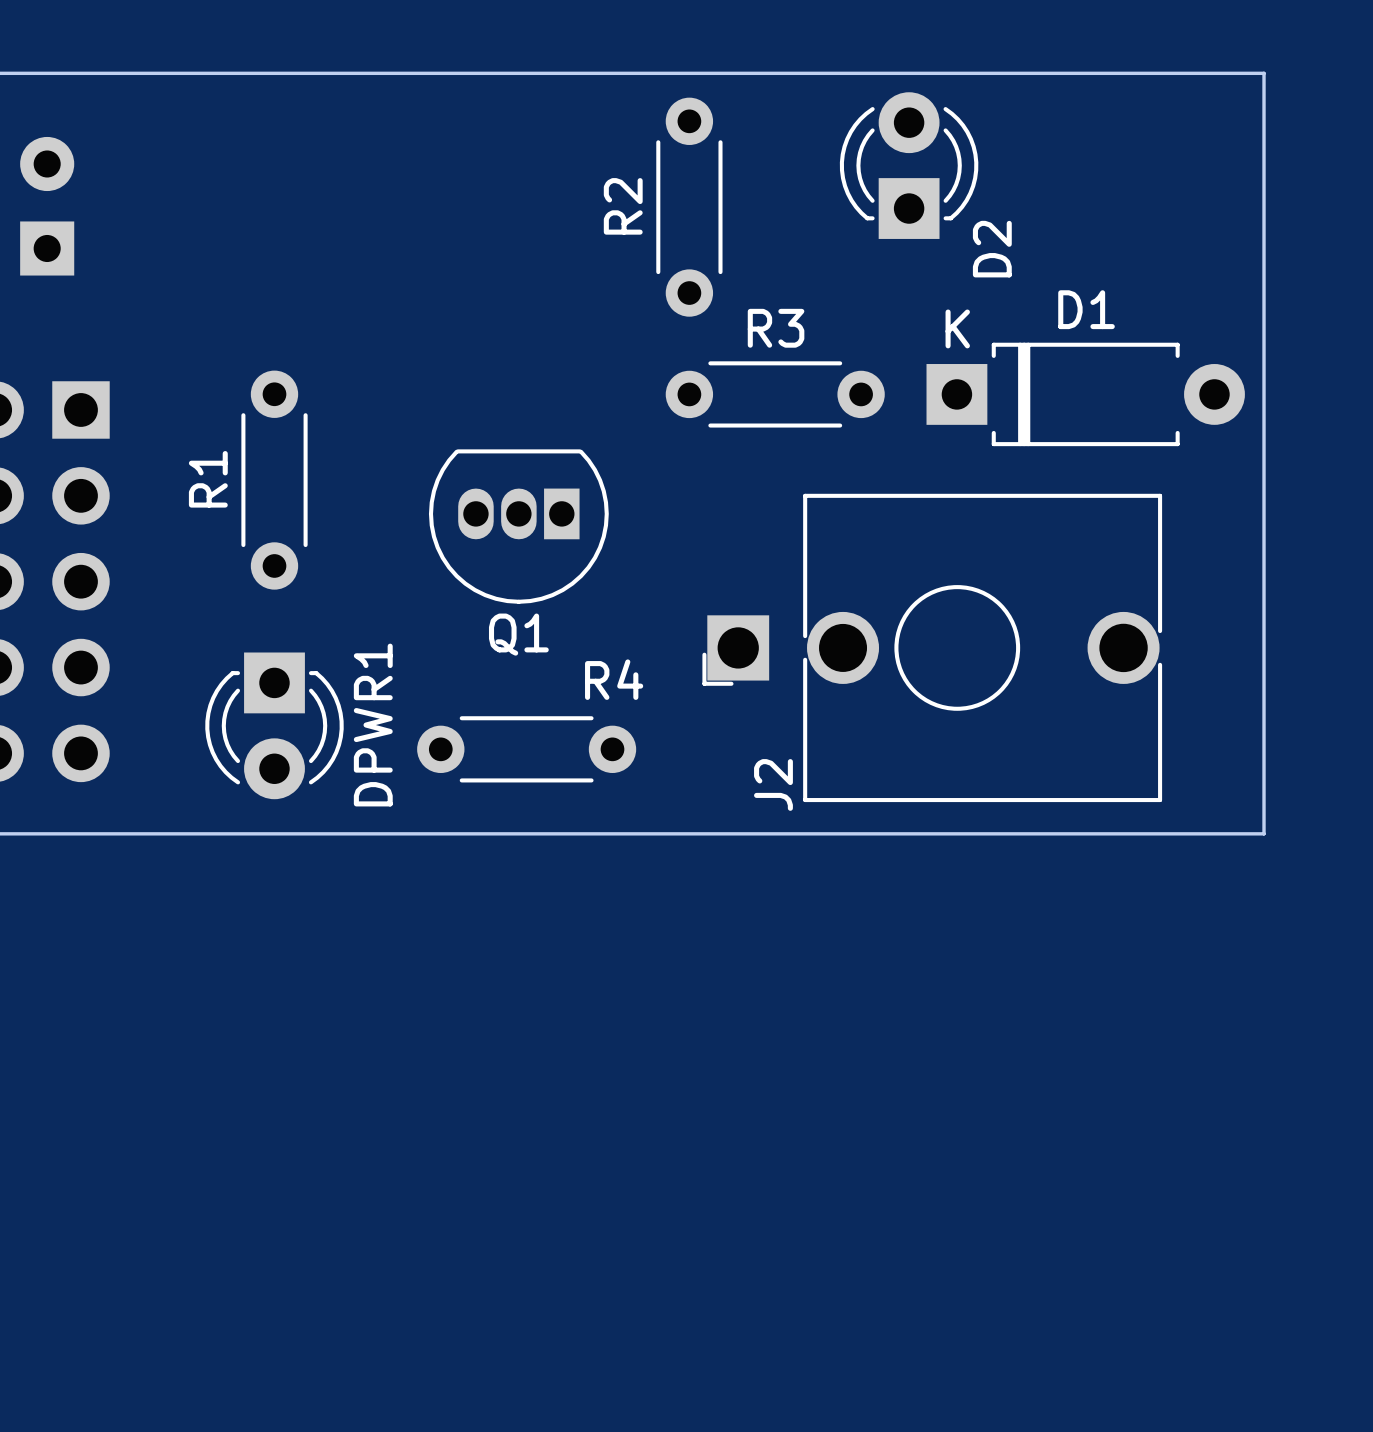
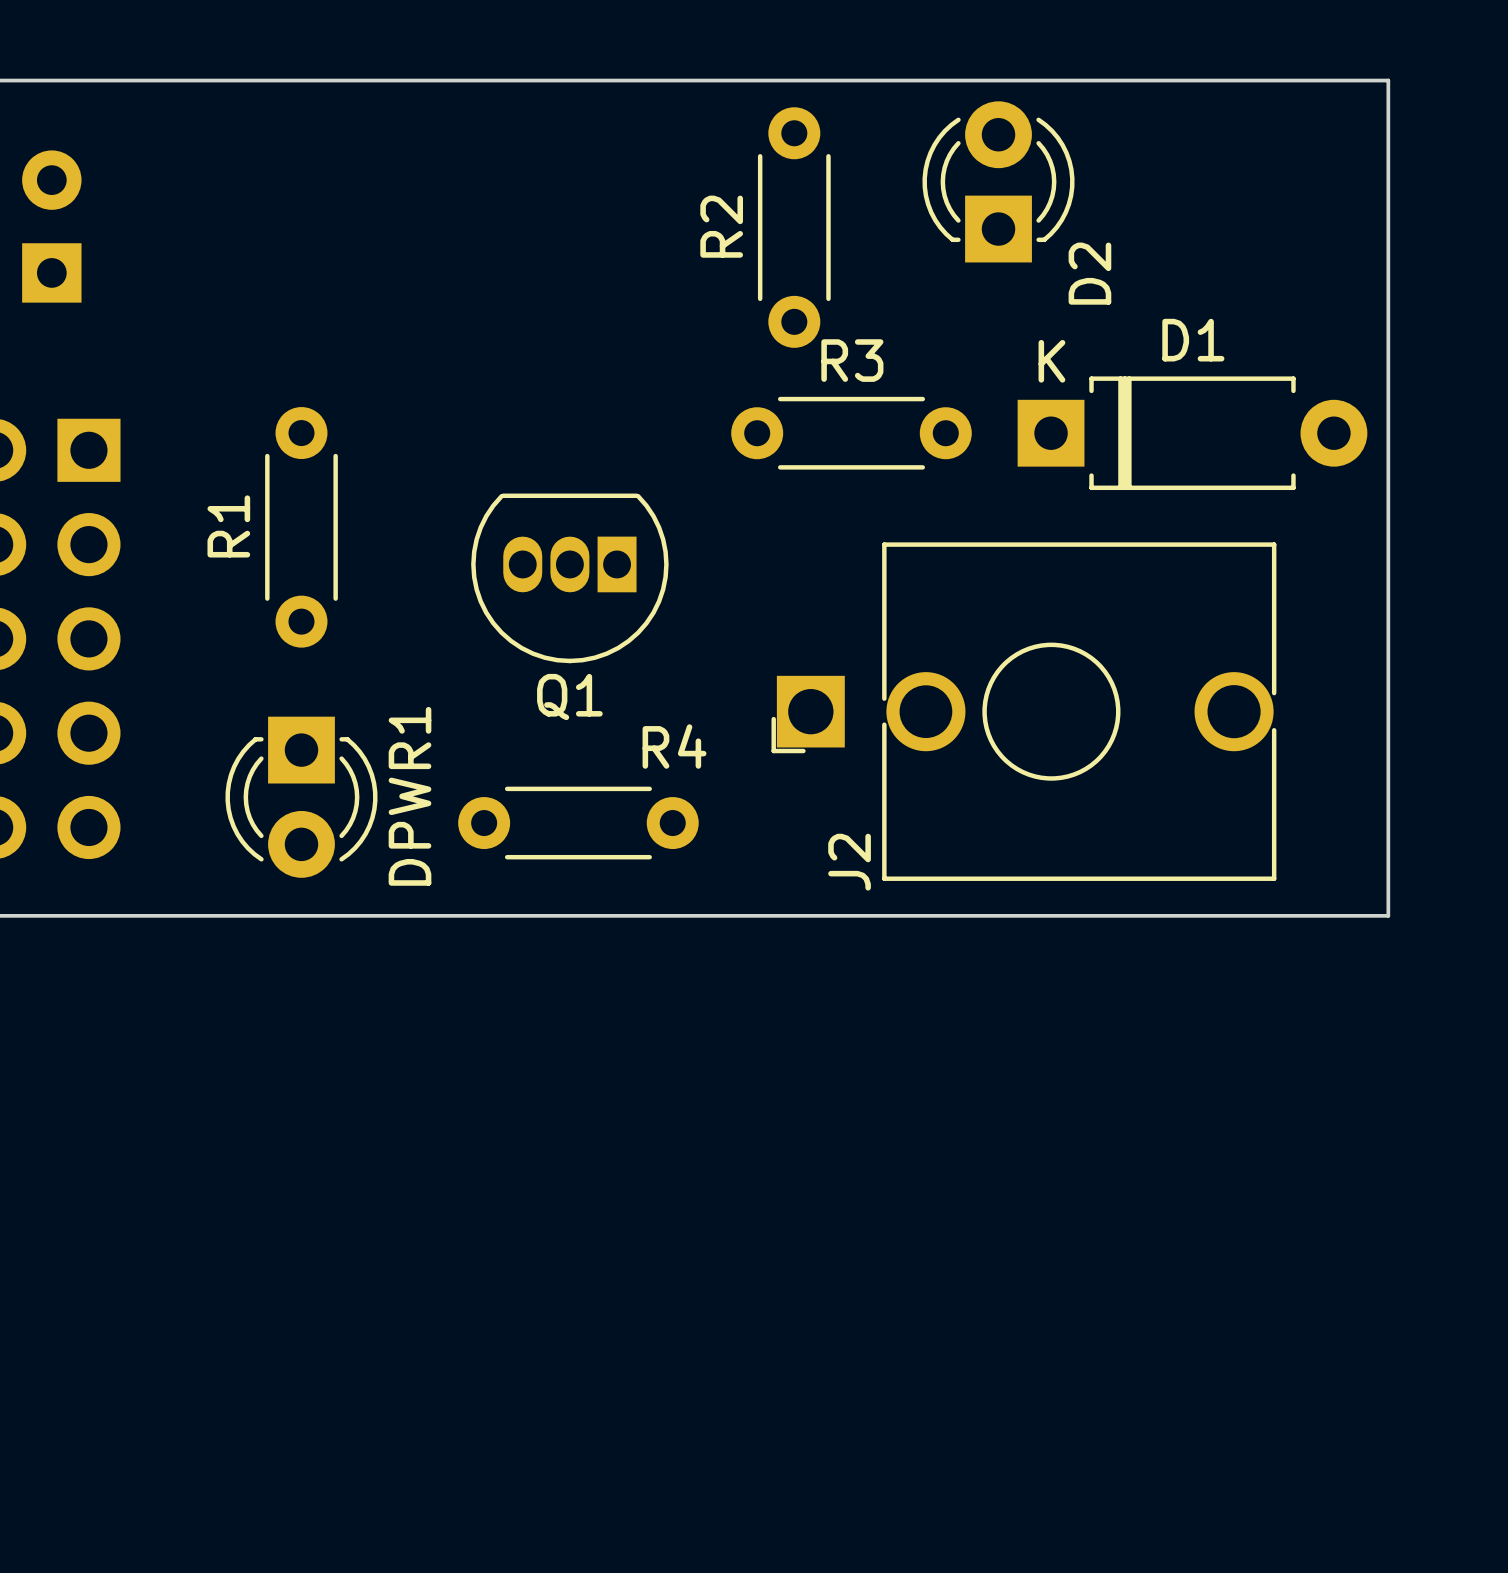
R2 position: (689, 207) -> (794, 227)

